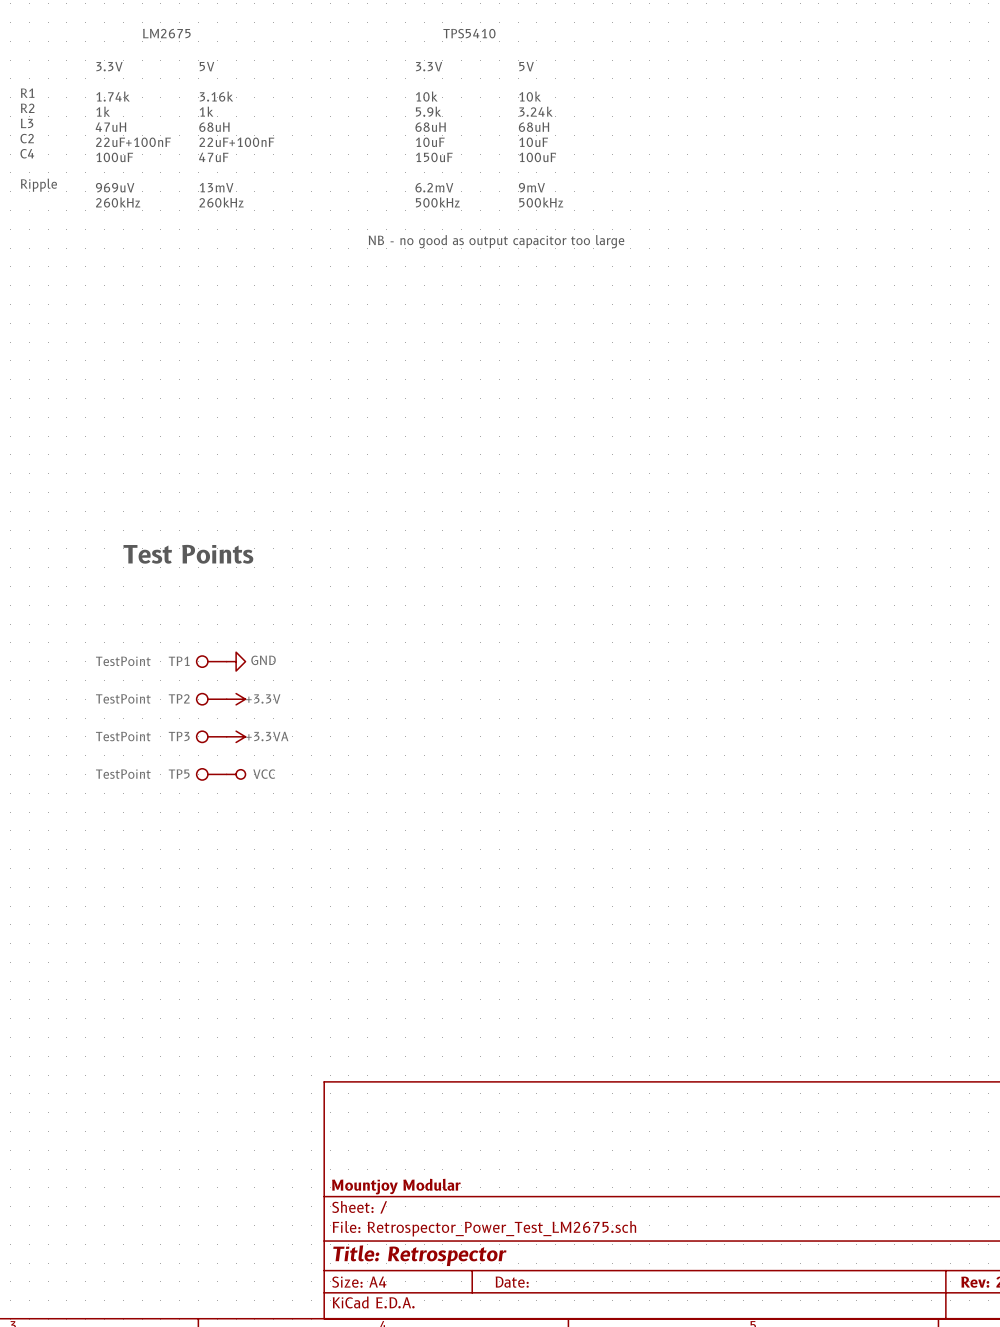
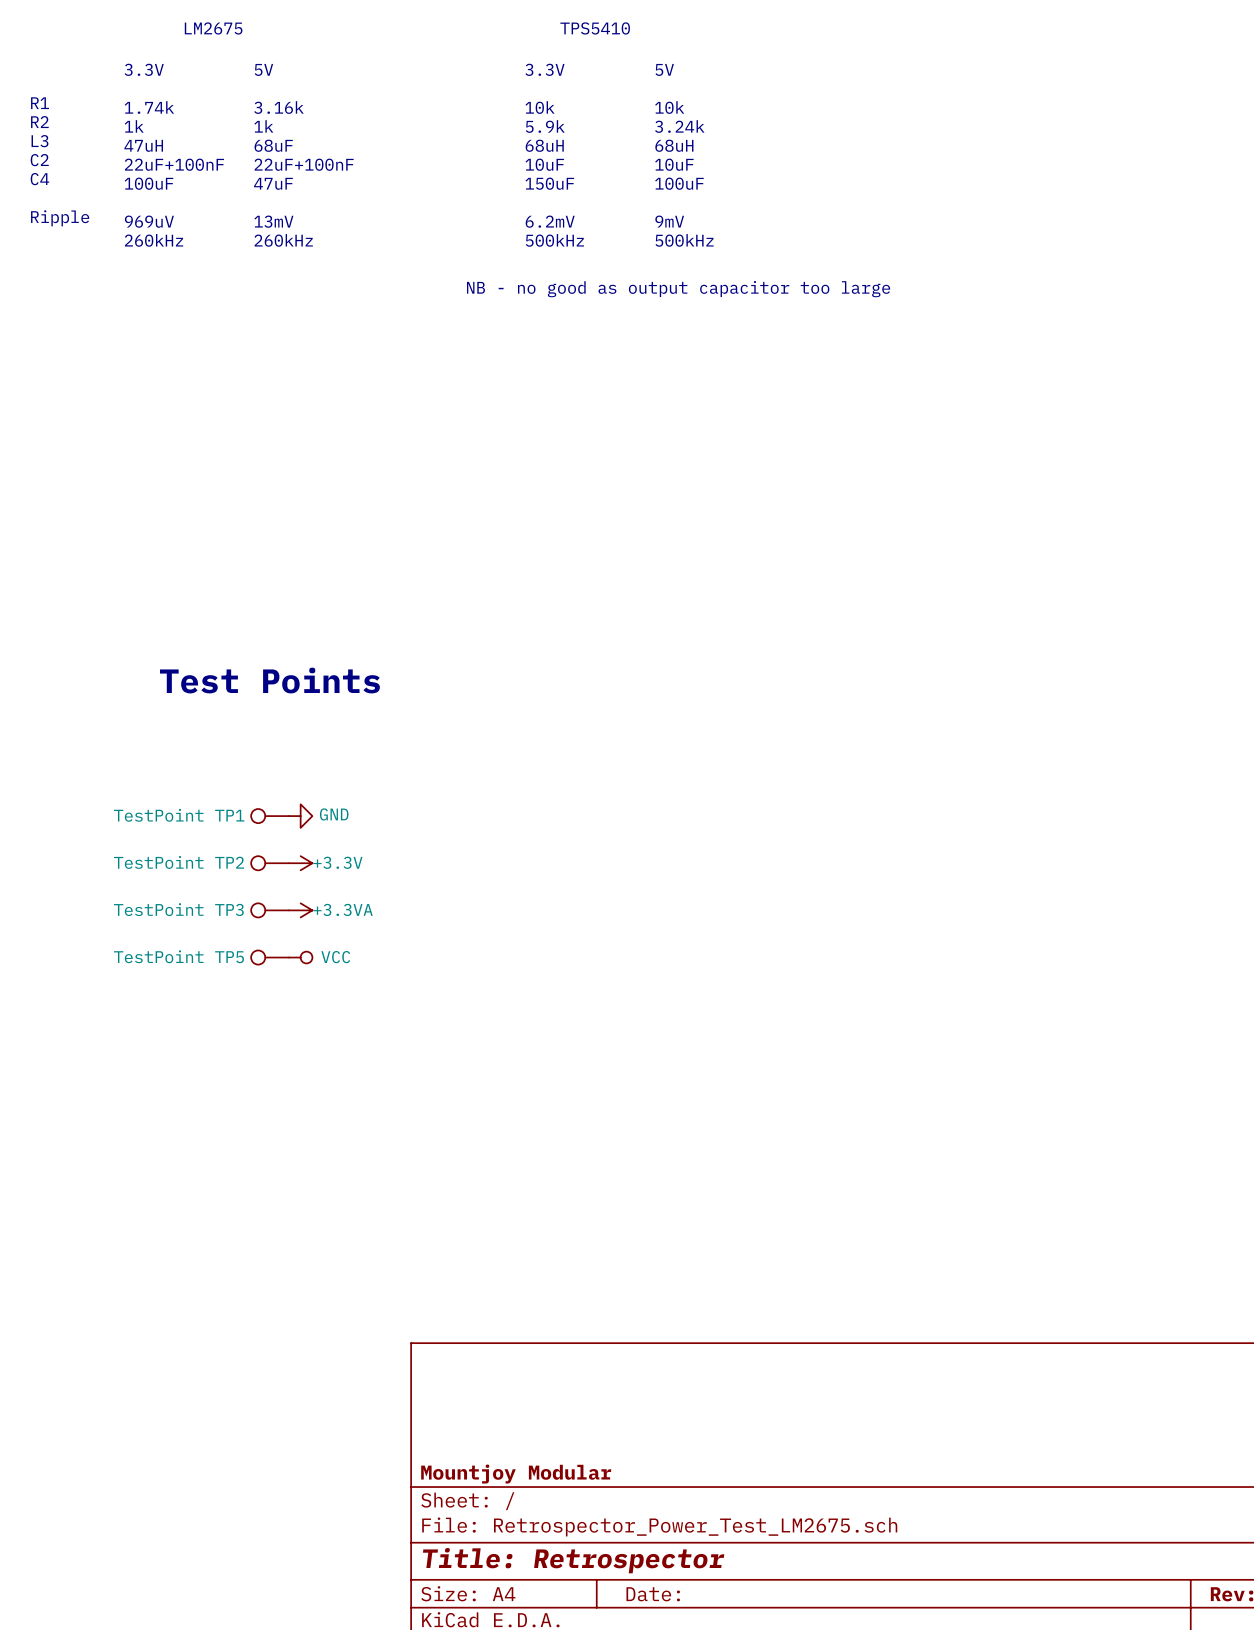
text: 68uH (214, 127) -> 68uF (273, 145)

